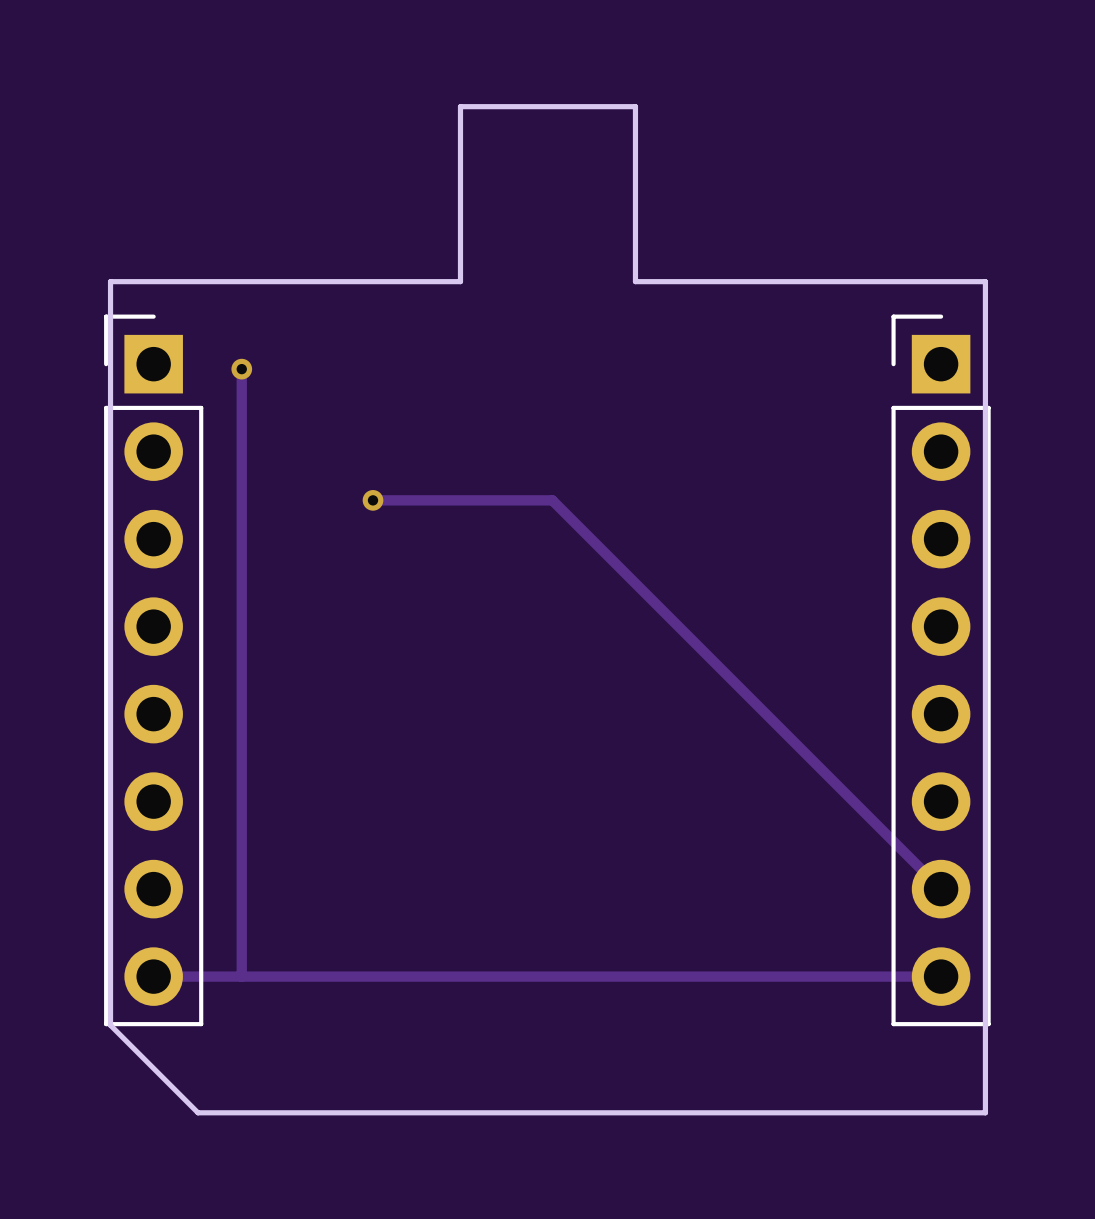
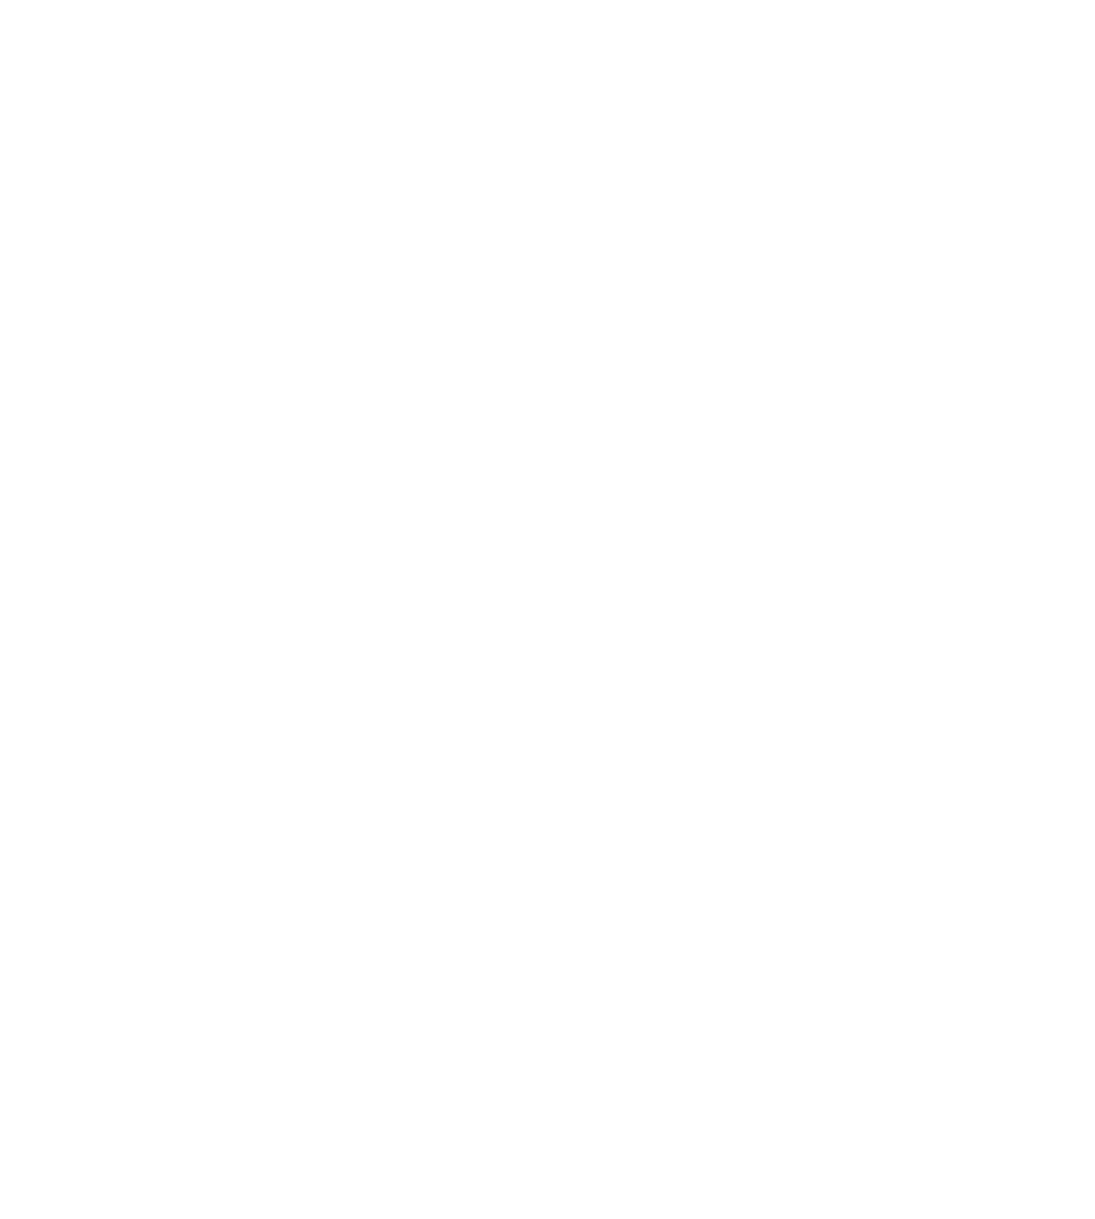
board edge: (635, 106) (460, 106) (460, 281) (110, 281) (110, 1025) (198, 1112) (985, 1112) (985, 281) (635, 281) (635, 106) -> none
track: (241, 369) (241, 976) -> none
via: (241, 369) -> none
track: (373, 500) (552, 500) (941, 889) -> none
via: (373, 500) -> none
part: (153, 670) -> none
part: (941, 670) -> none
track: (941, 976) (153, 976) -> none

